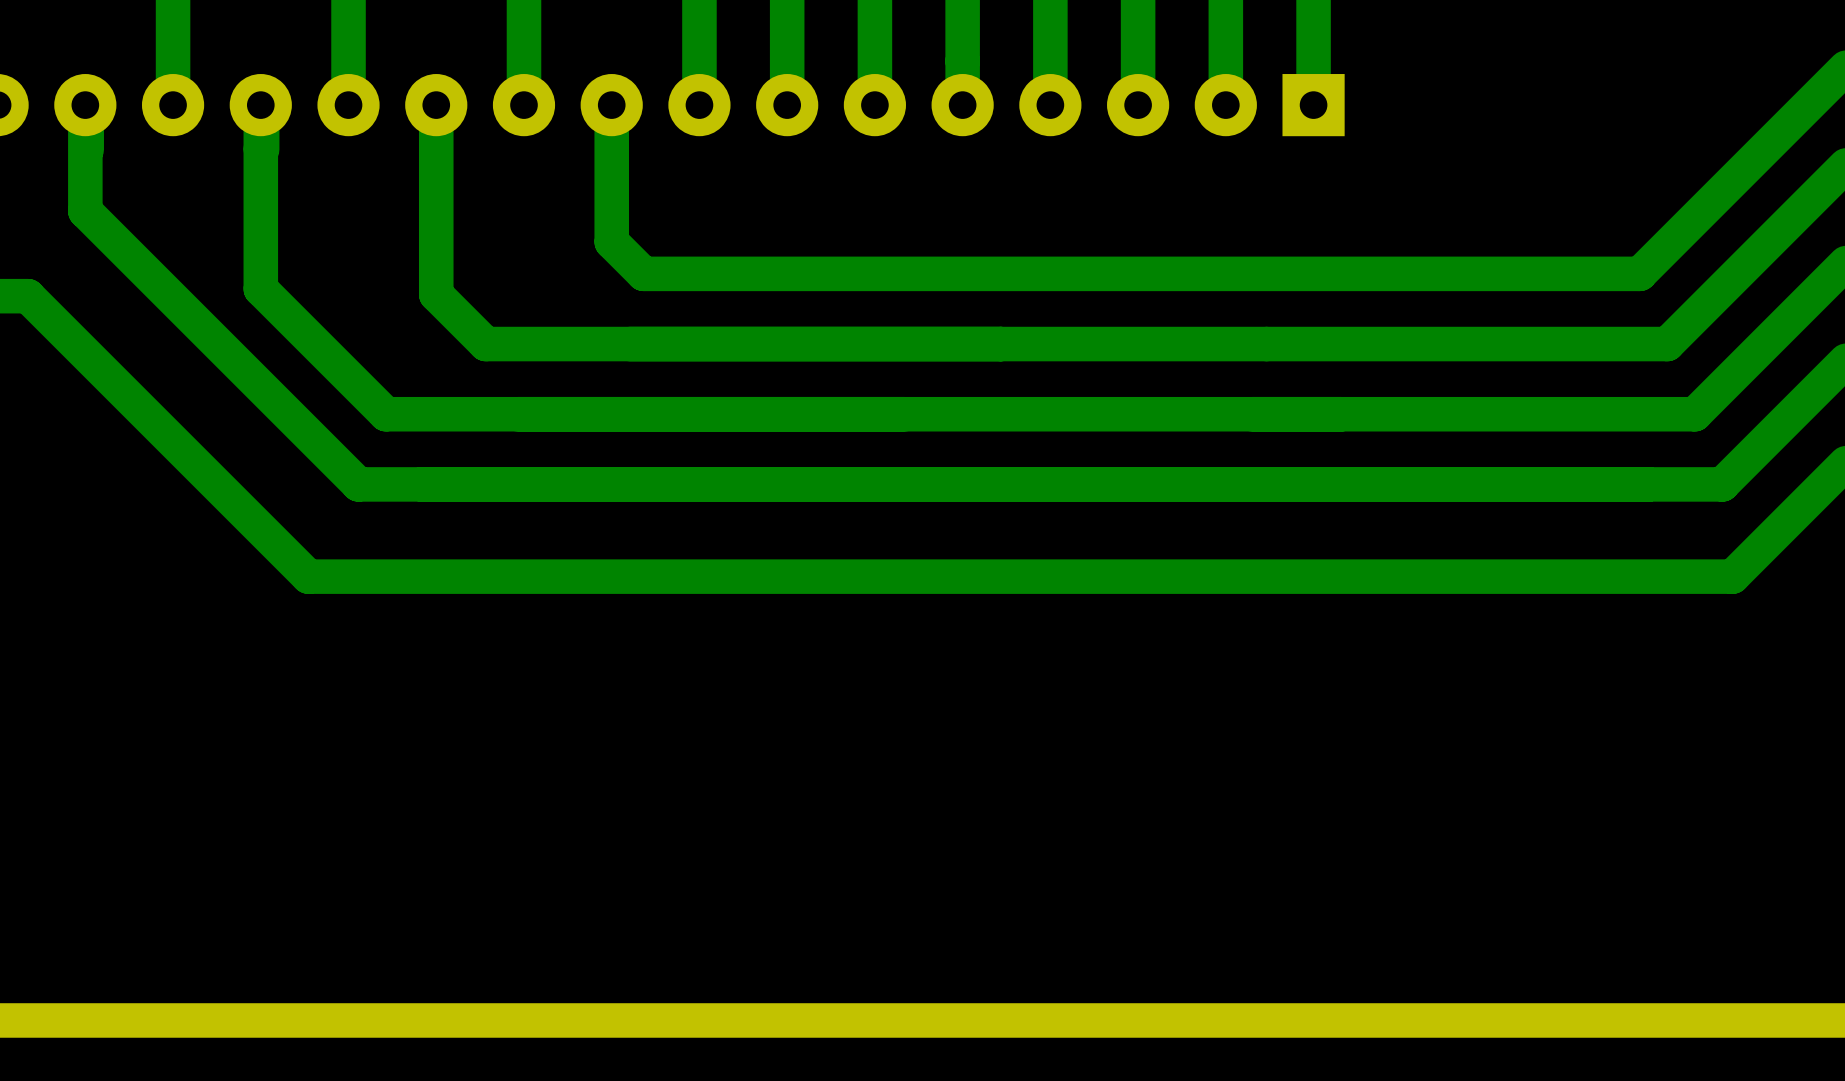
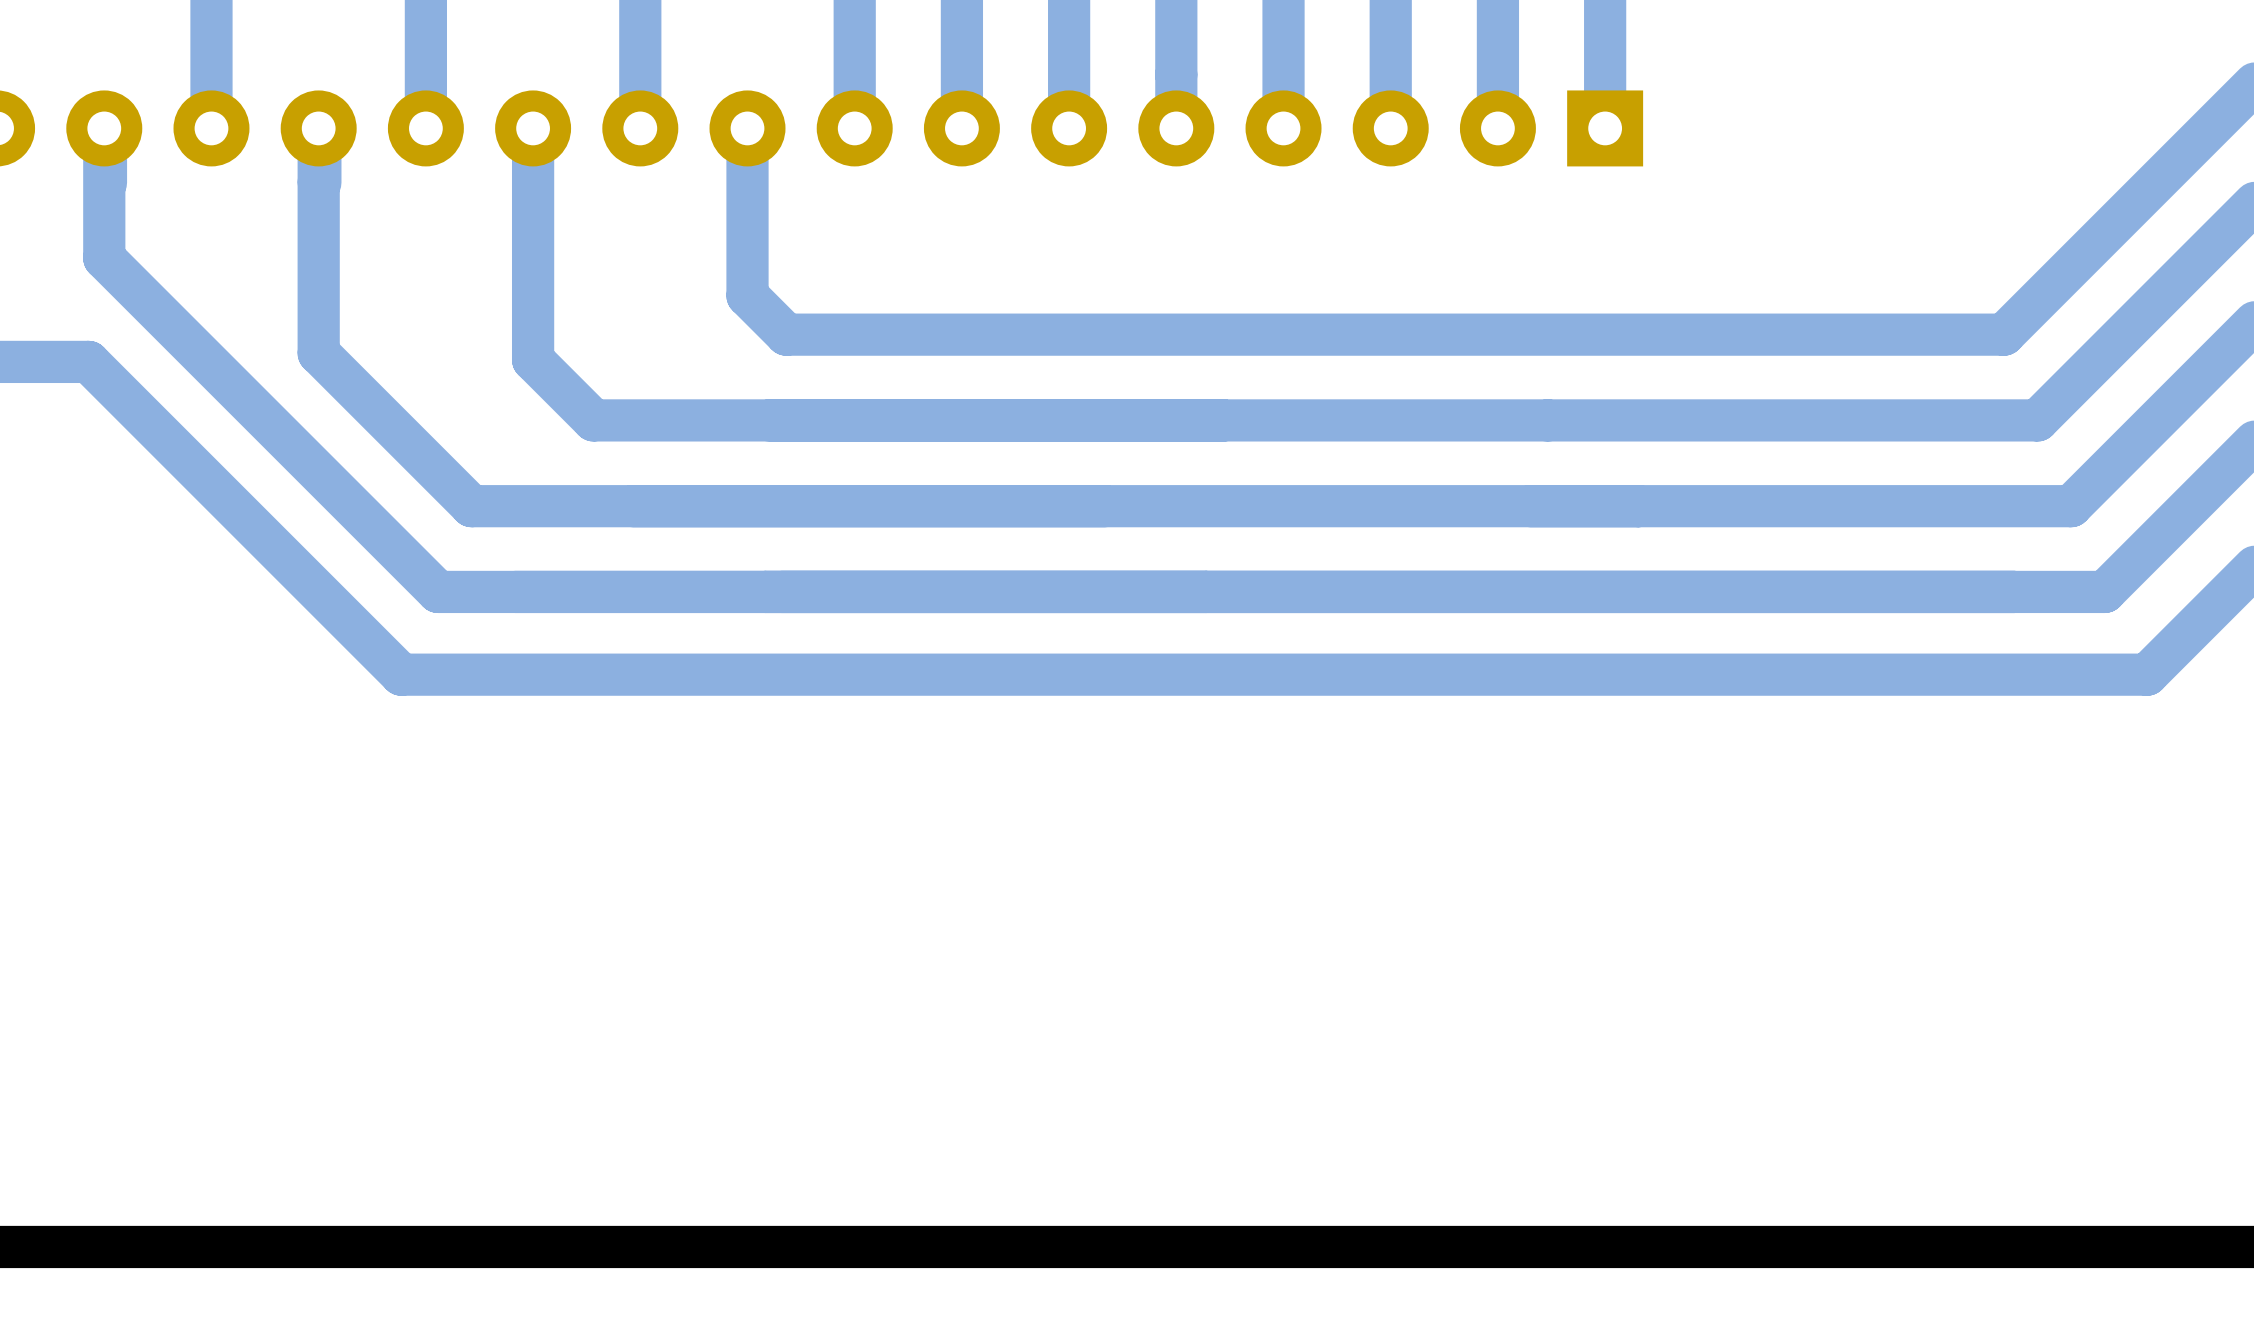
track: (28, 296) (308, 576) (1732, 576) (1757, 552) -> (34, 361) (88, 361) (401, 674) (2147, 674)

